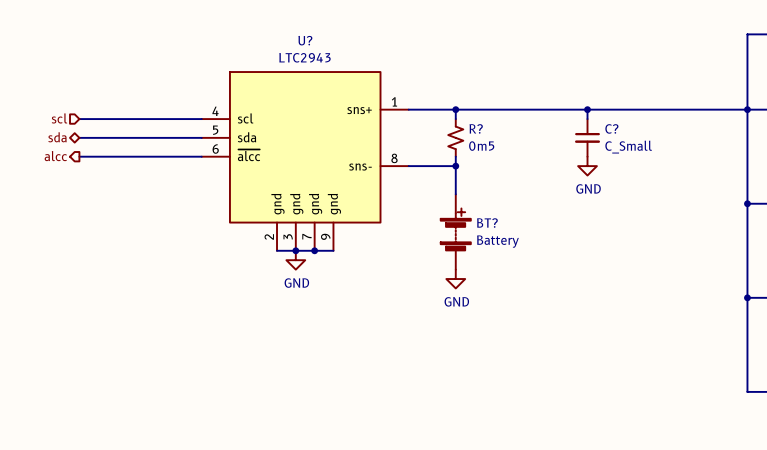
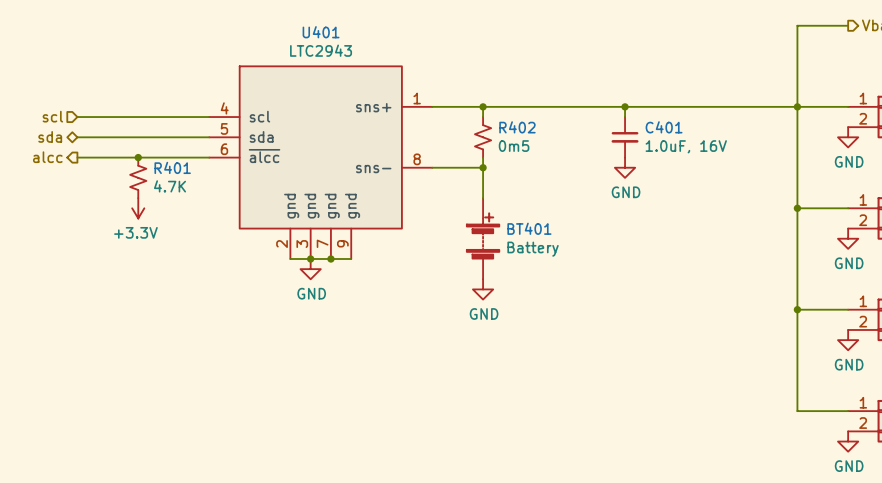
U? name: U? (305, 40) -> U401 (321, 32)
R? name: R? (476, 128) -> R402 (517, 127)
C? name: C? (611, 128) -> C401 (664, 127)
C? value: C_Small (628, 147) -> 1.0uF, 16V (686, 146)
junction: none -> (138, 157)
R401: none -> 4.7K (138, 177)
power symbol: none -> +3.3V (138, 208)
BT? name: BT? (487, 223) -> BT401 (529, 228)

